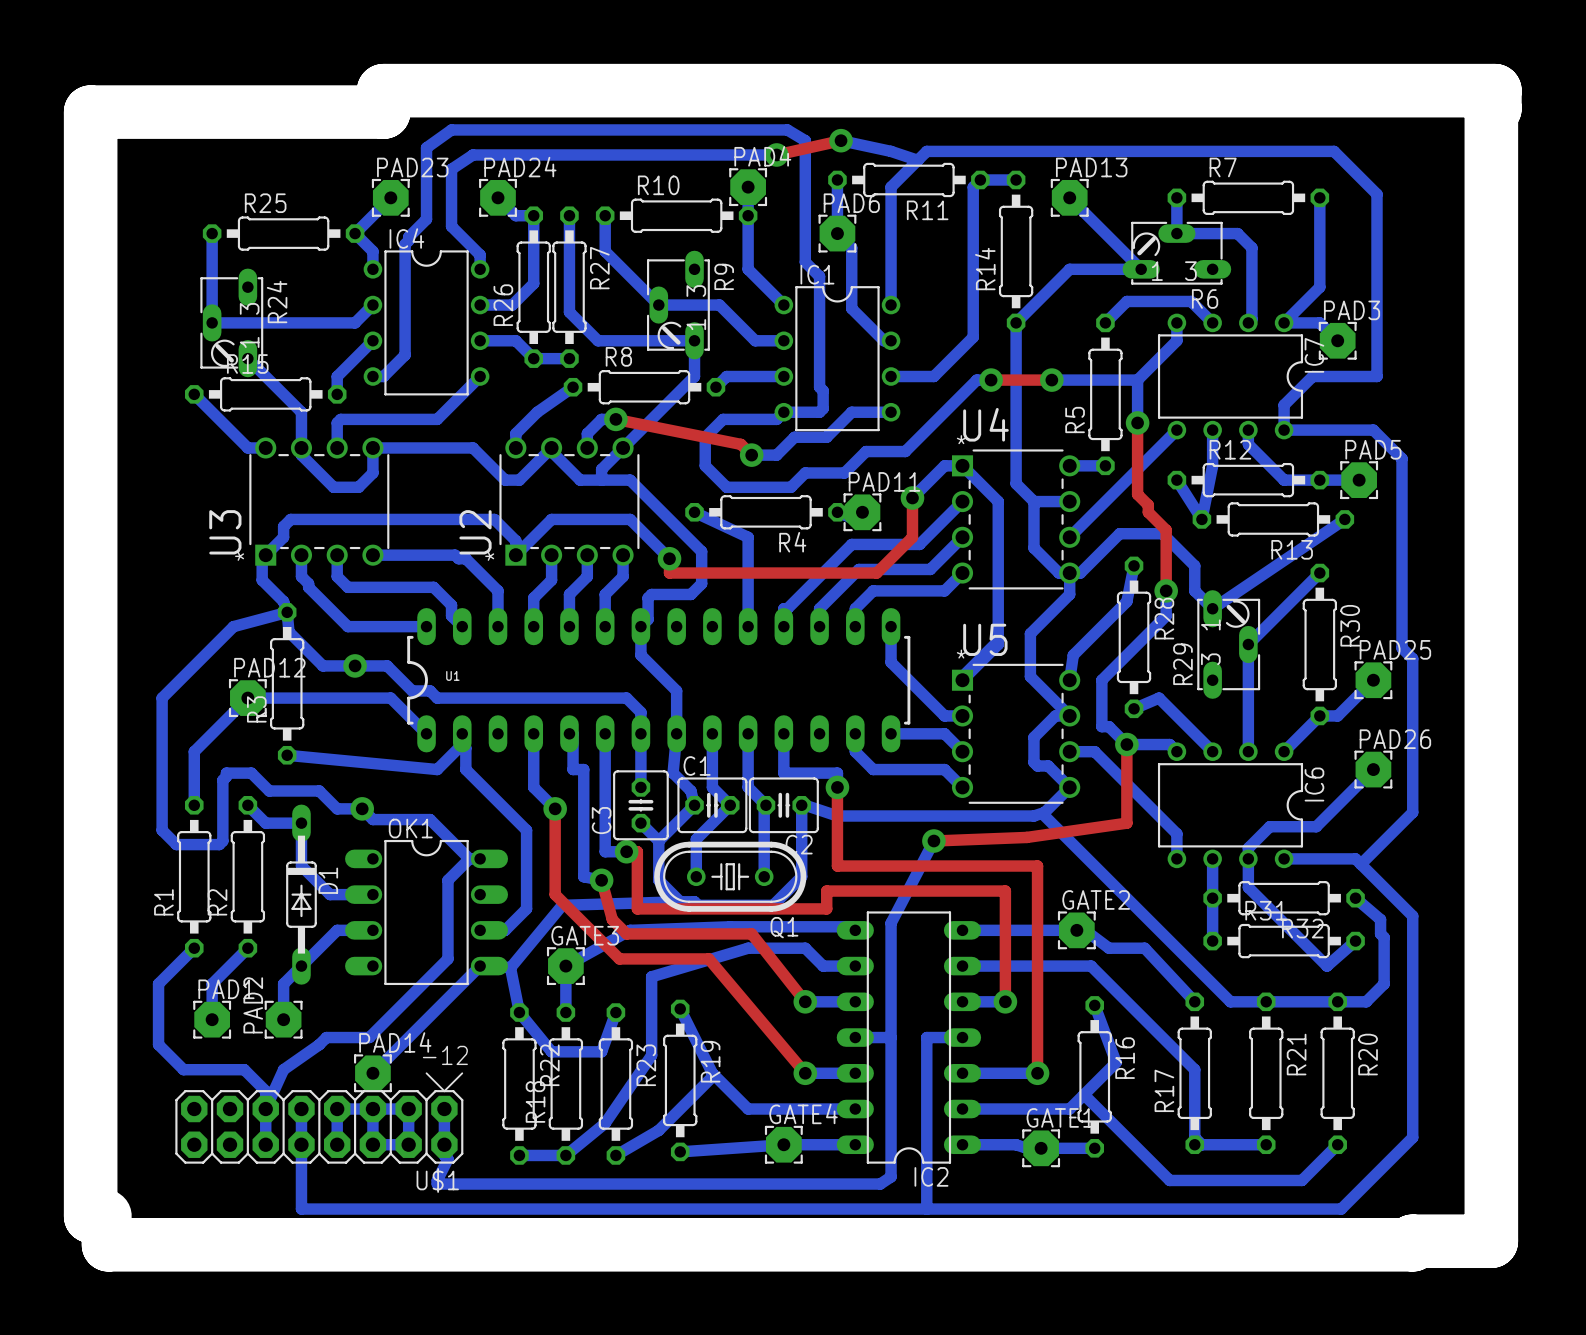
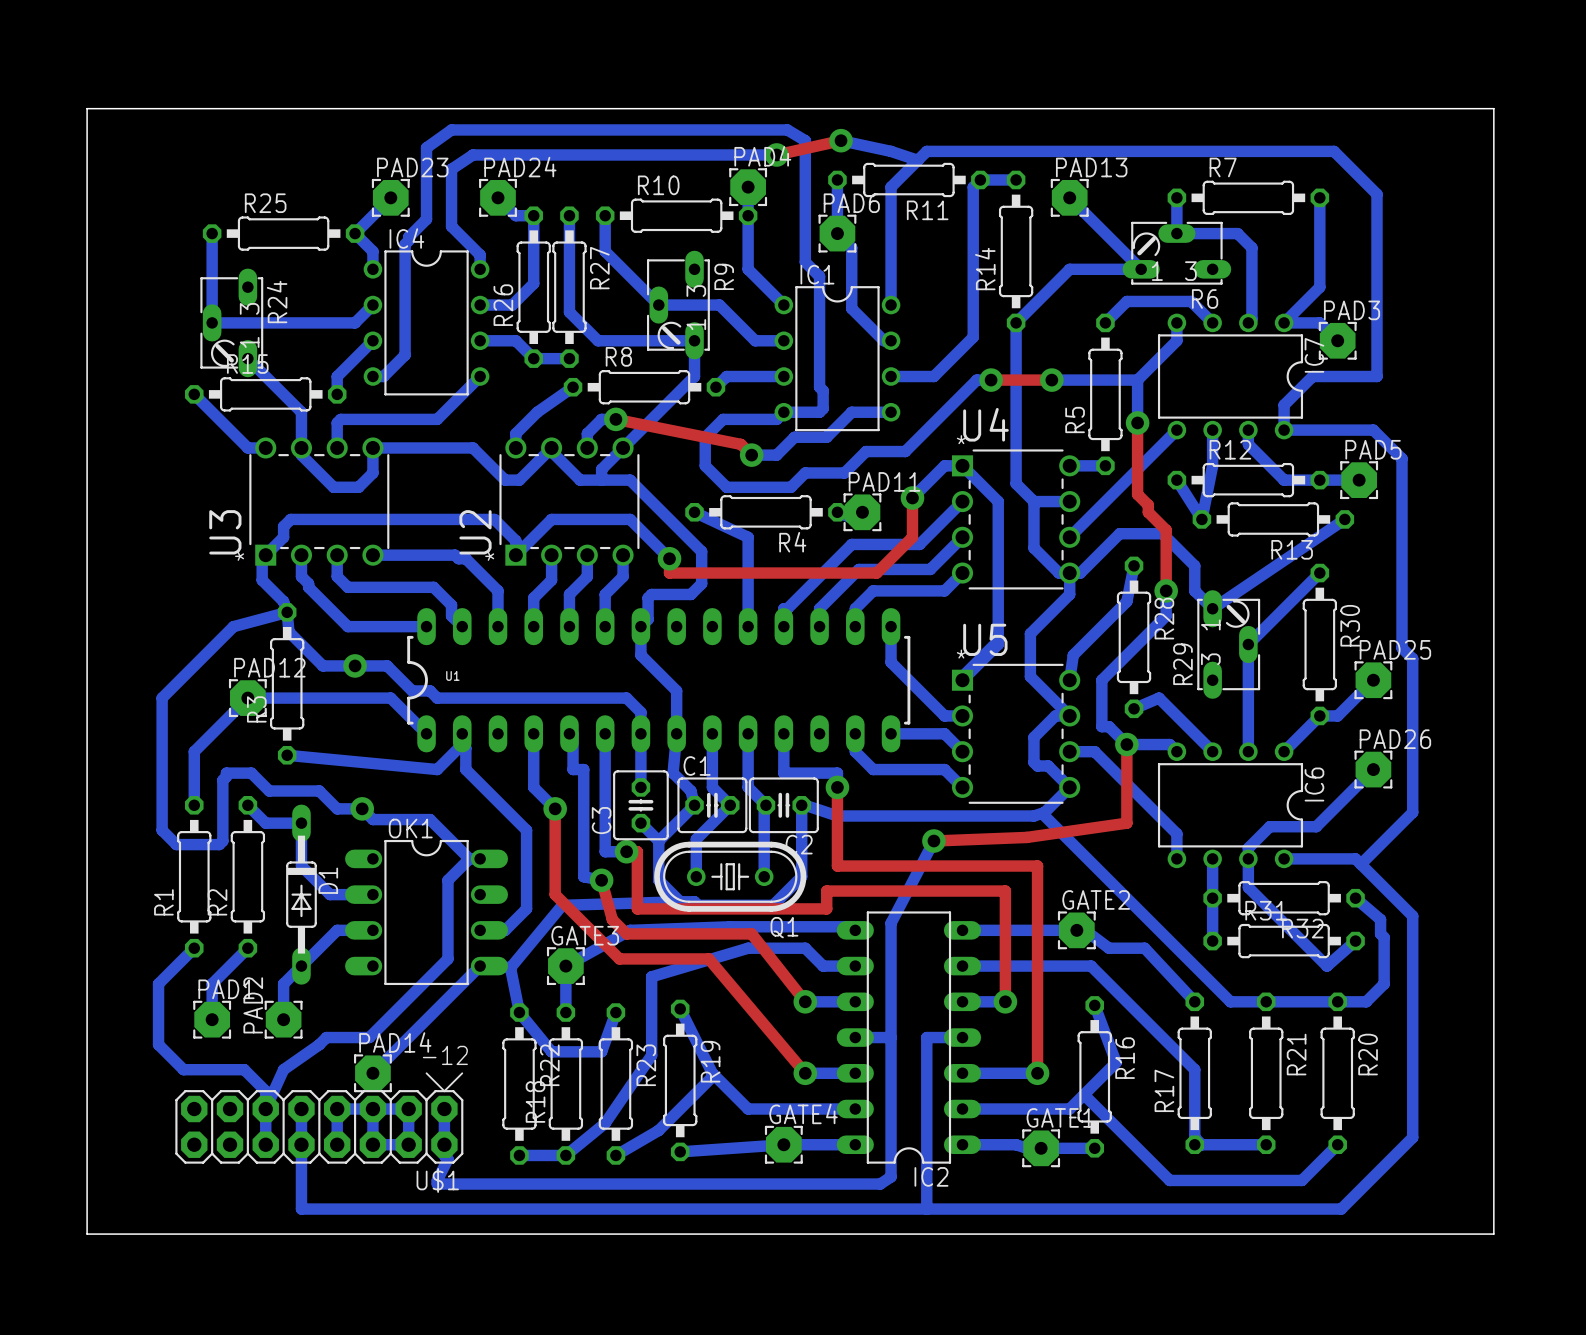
board edge: (104, 1216) (90, 1216) (90, 112) (383, 112) (383, 90) (1494, 90) (1494, 108) (1491, 108) (1491, 1241) (1412, 1241) (1412, 1244) (108, 1244) (108, 1234) -> none

